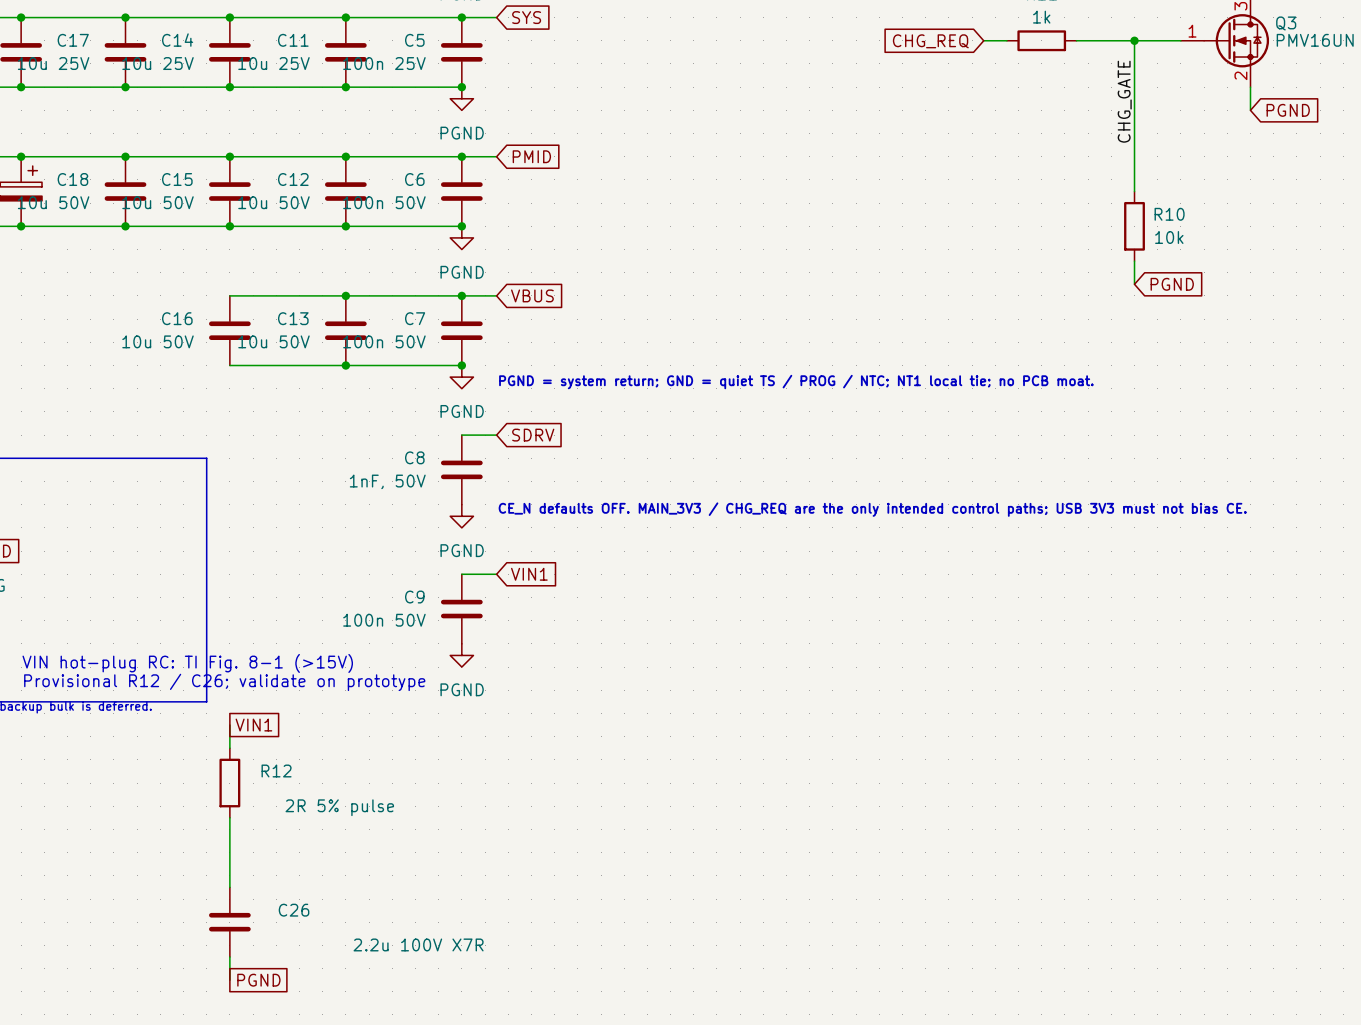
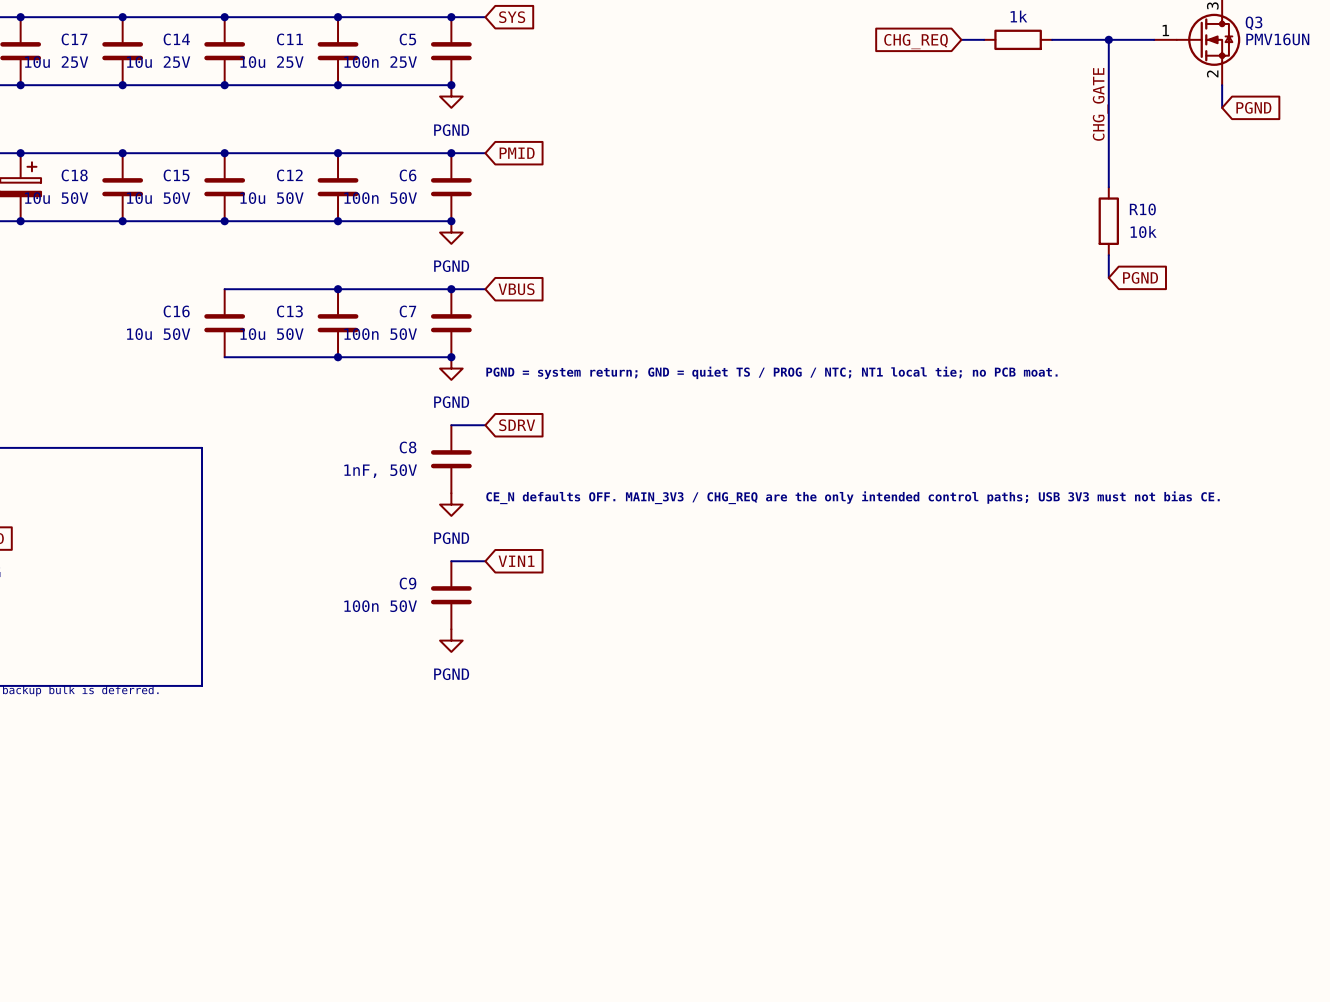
text: VIN hot-plug RC: TI Fig. 8-1 (>15V) (187, 663) -> none
text: Provisional R12 / C26; validate on prototype (224, 682) -> none
wire: (229, 725) (229, 748) -> none
global label: VIN1 (253, 725) -> none
R12: 2R 5% pulse (229, 783) -> none
wire: (229, 817) (229, 887) -> none
C26: 2.2u 100V X7R (229, 922) -> none
wire: (229, 956) (229, 980) -> none
global label: PGND (258, 980) -> none

